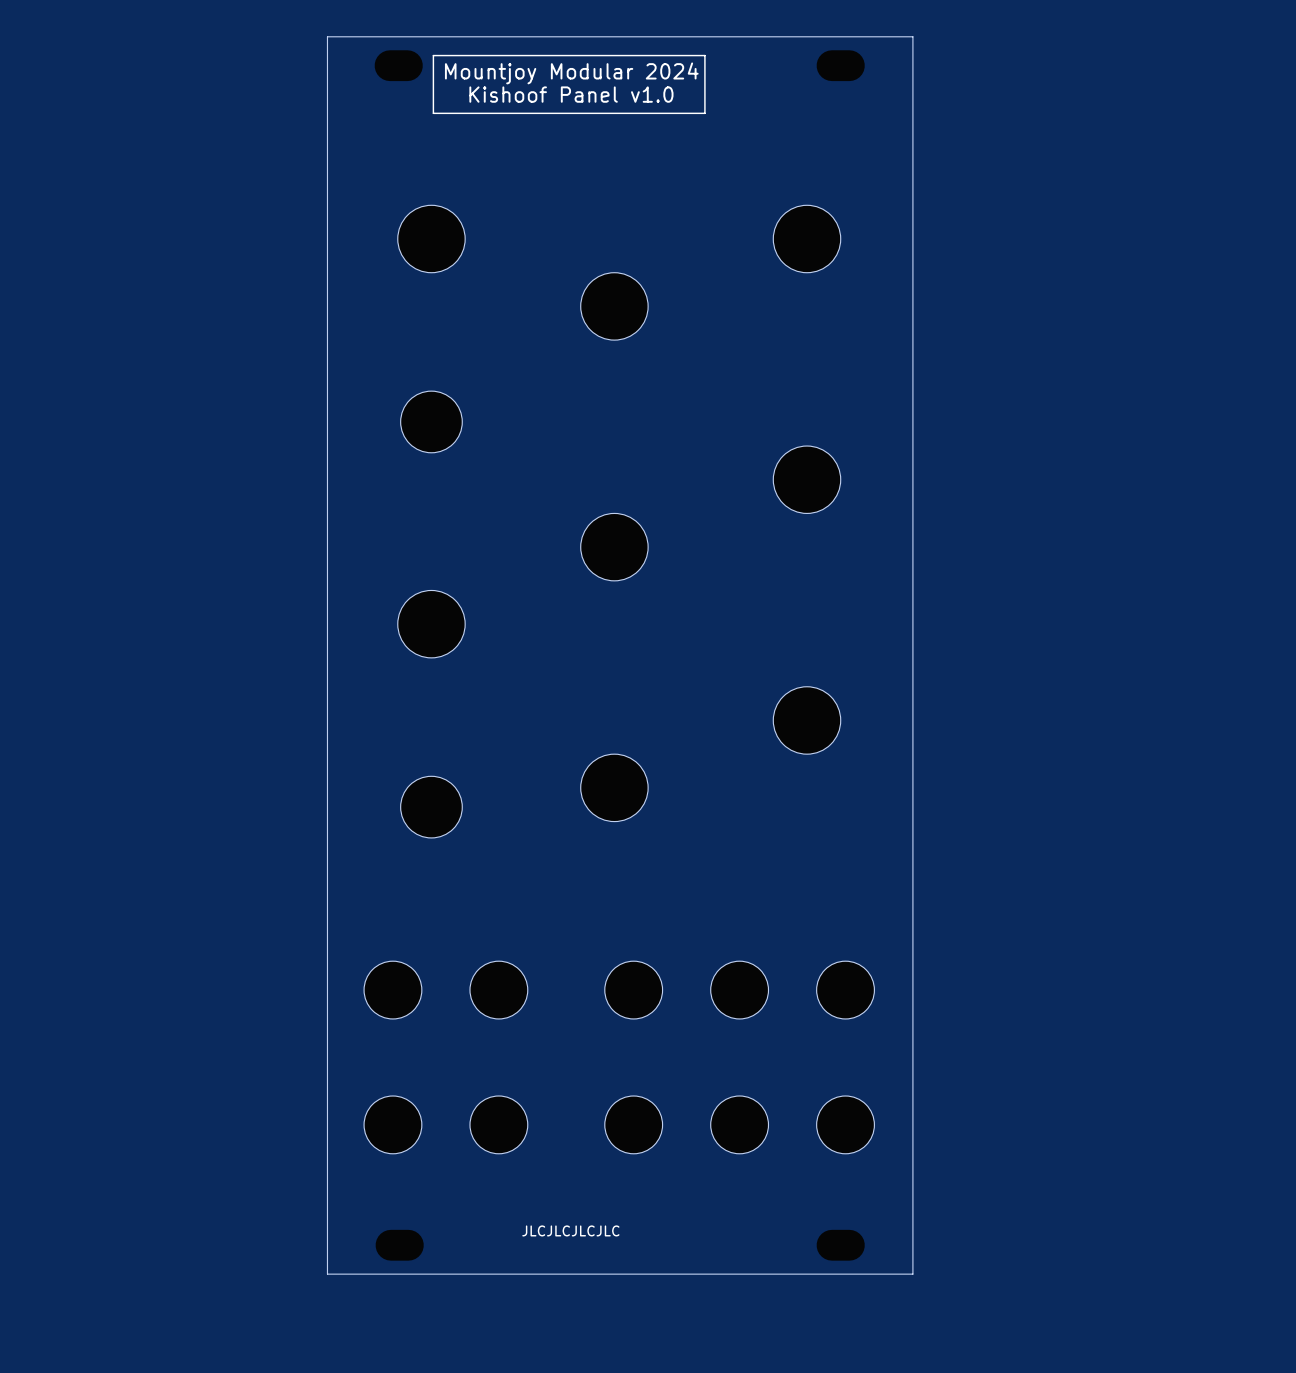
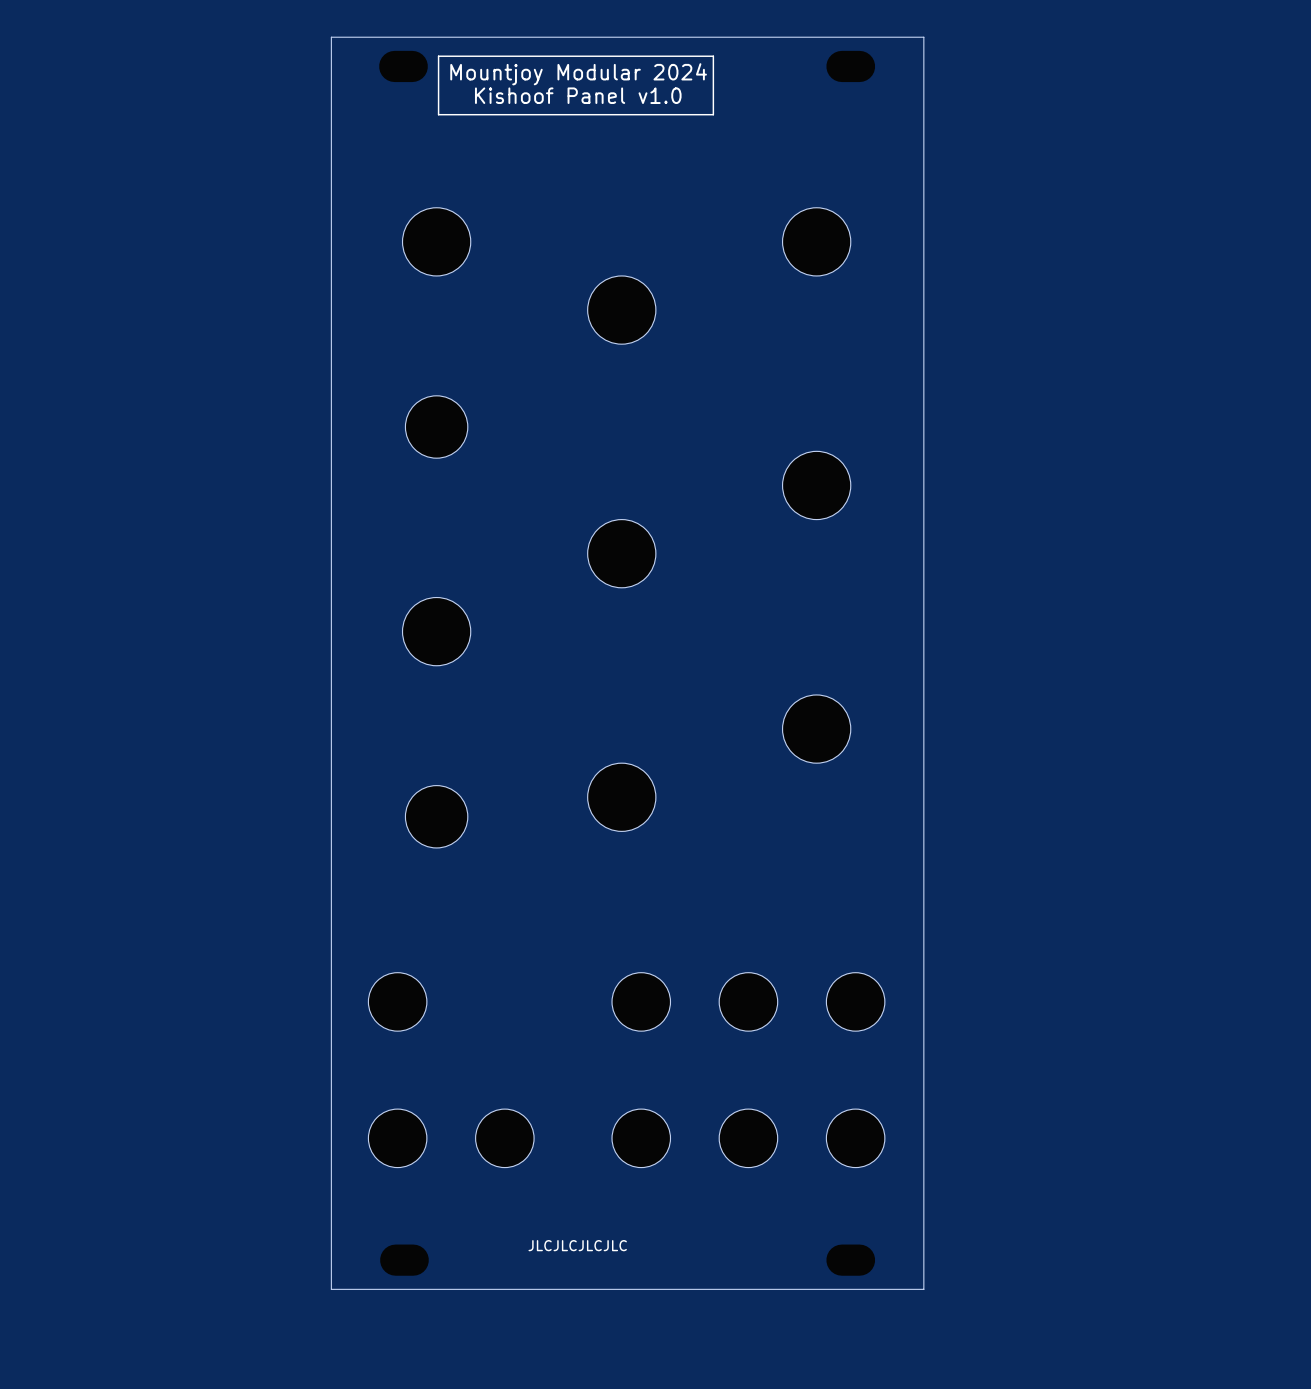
part: (498, 990) -> none

